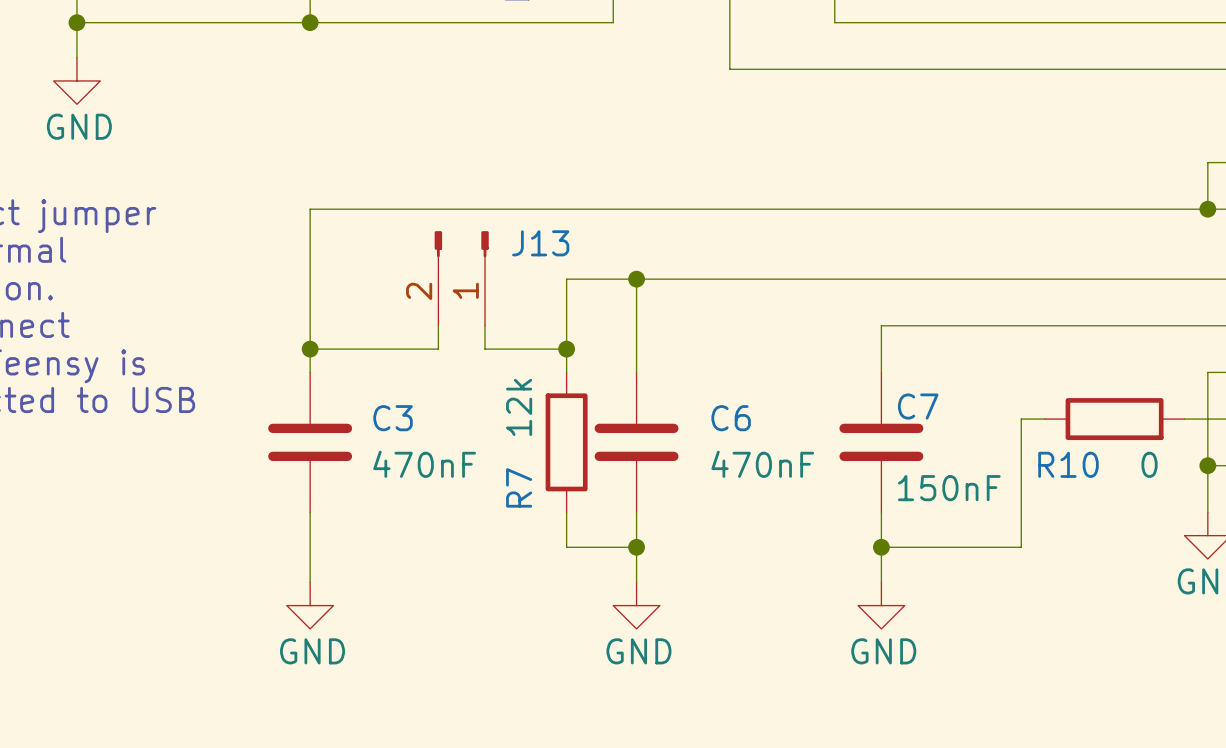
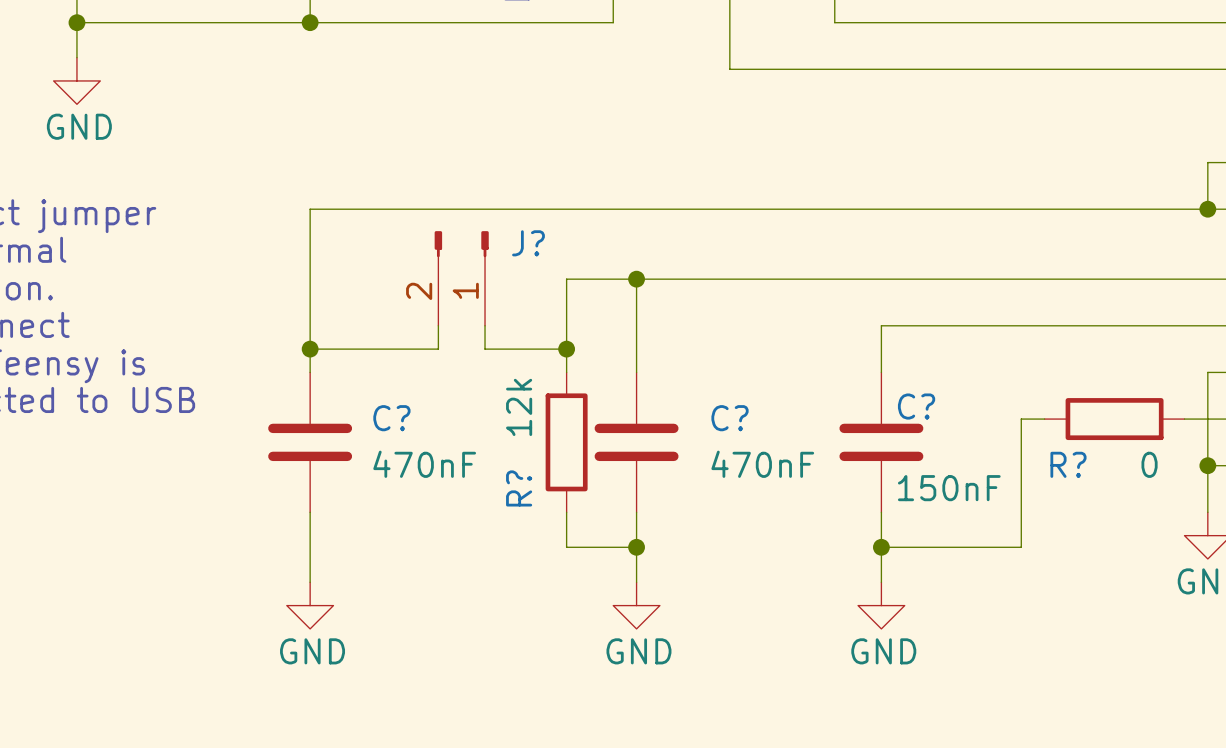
J13 name: J13 (540, 243) -> J? (528, 243)
C7 name: C7 (918, 406) -> C? (916, 406)
C3 name: C3 (393, 418) -> C? (391, 418)
C6 name: C6 (731, 418) -> C? (730, 418)
R10 name: R10 (1068, 464) -> R? (1068, 464)
R7 name: R7 (519, 487) -> R? (519, 488)

